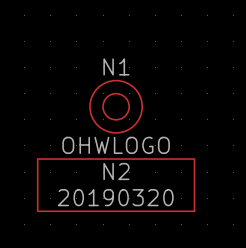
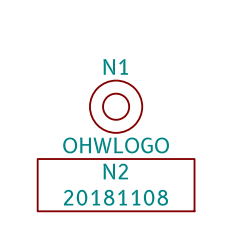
N2 value: 20190320 (115, 197) -> 20181108 (116, 197)

